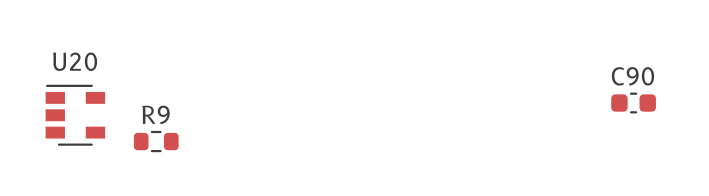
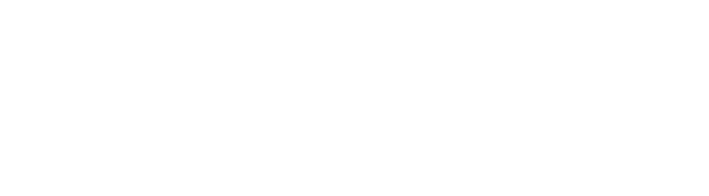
C90: (633, 103) -> none
U20: (75, 115) -> none
R9: (156, 141) -> none

